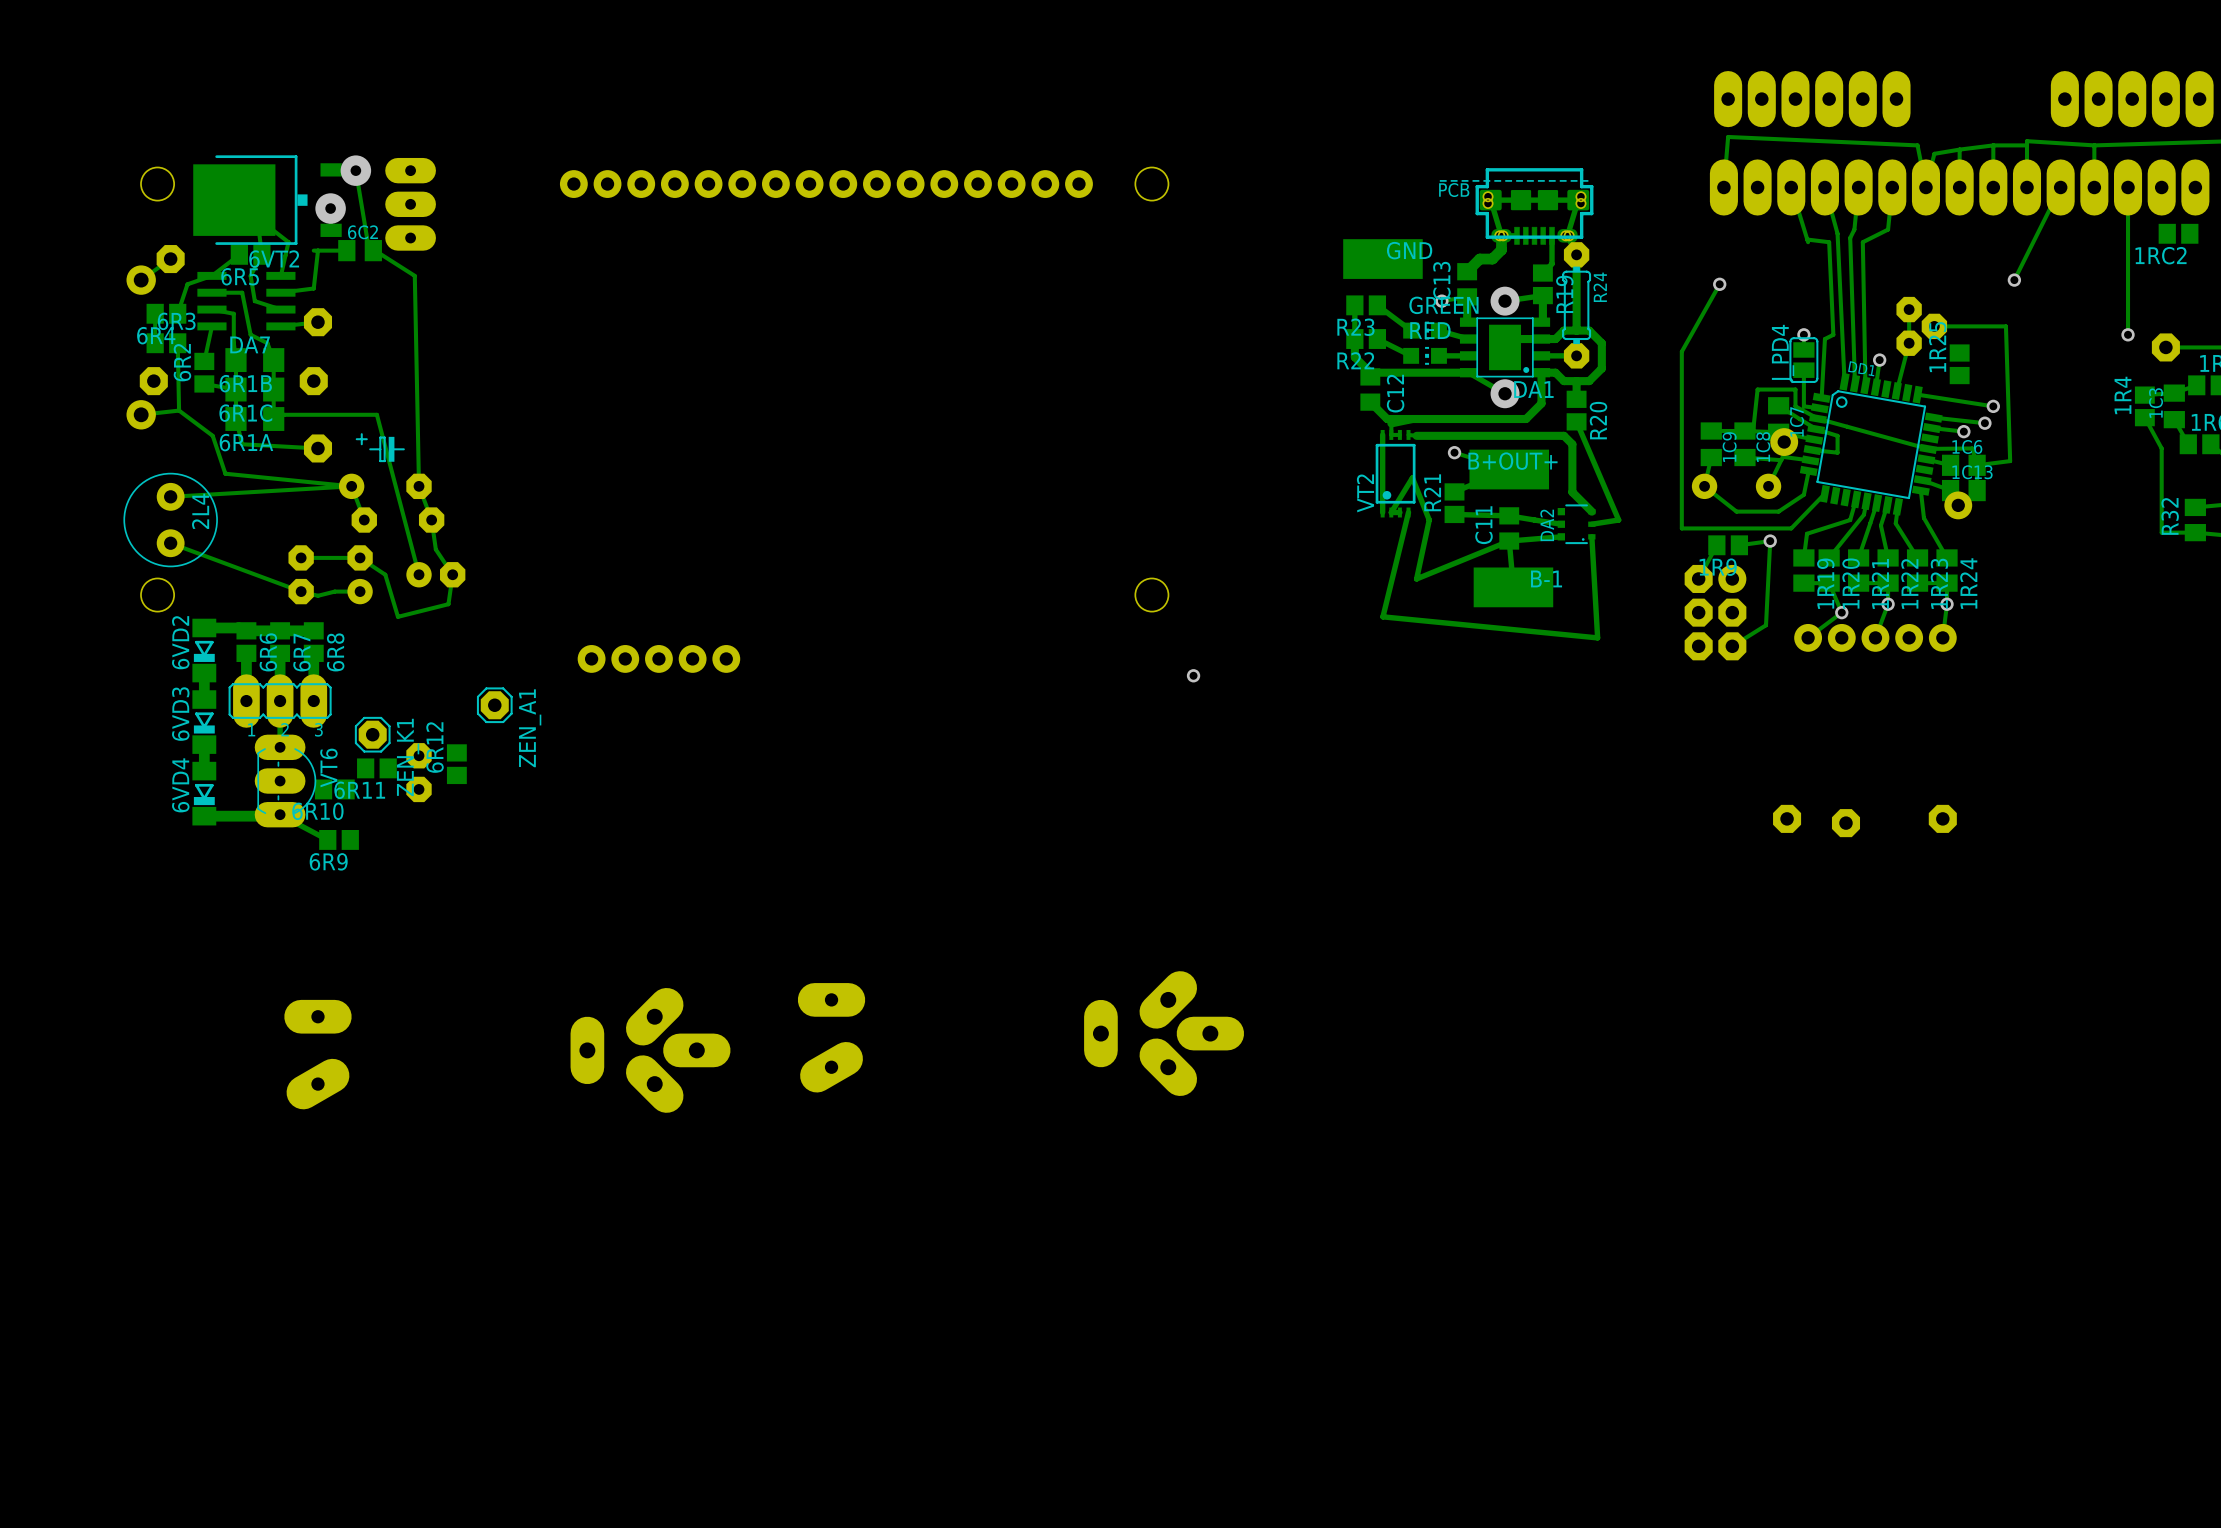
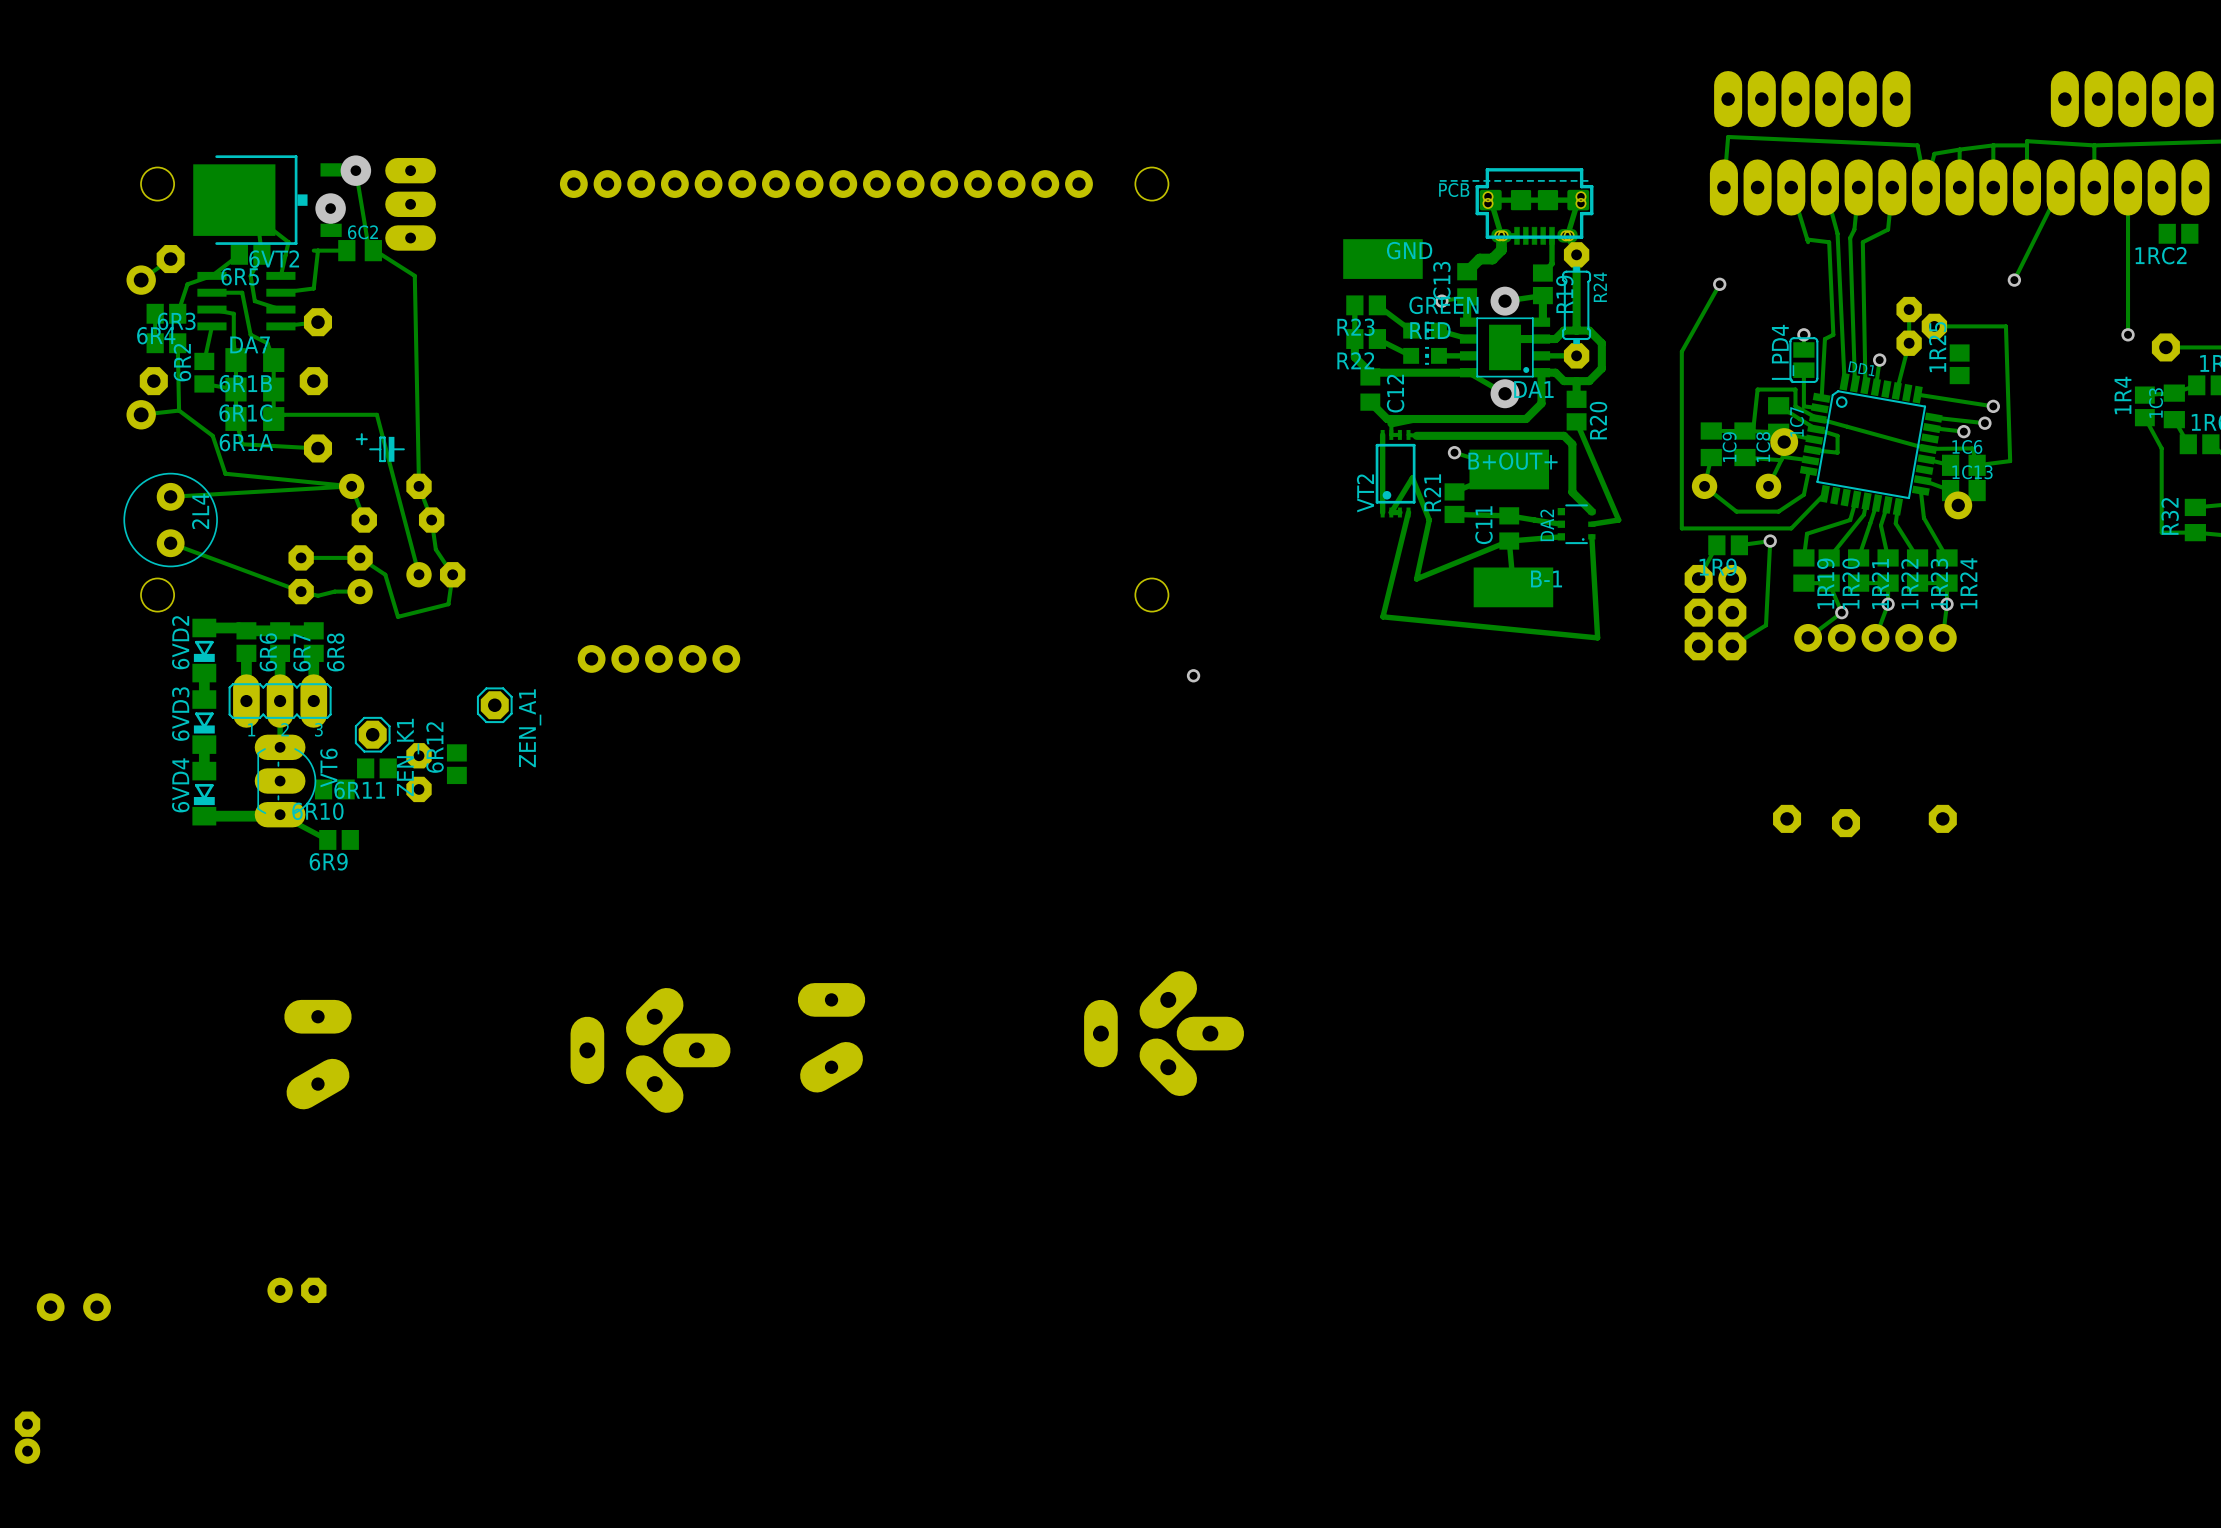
part: none -> (296, 1290)
part: none -> (73, 1307)
part: none -> (27, 1437)

